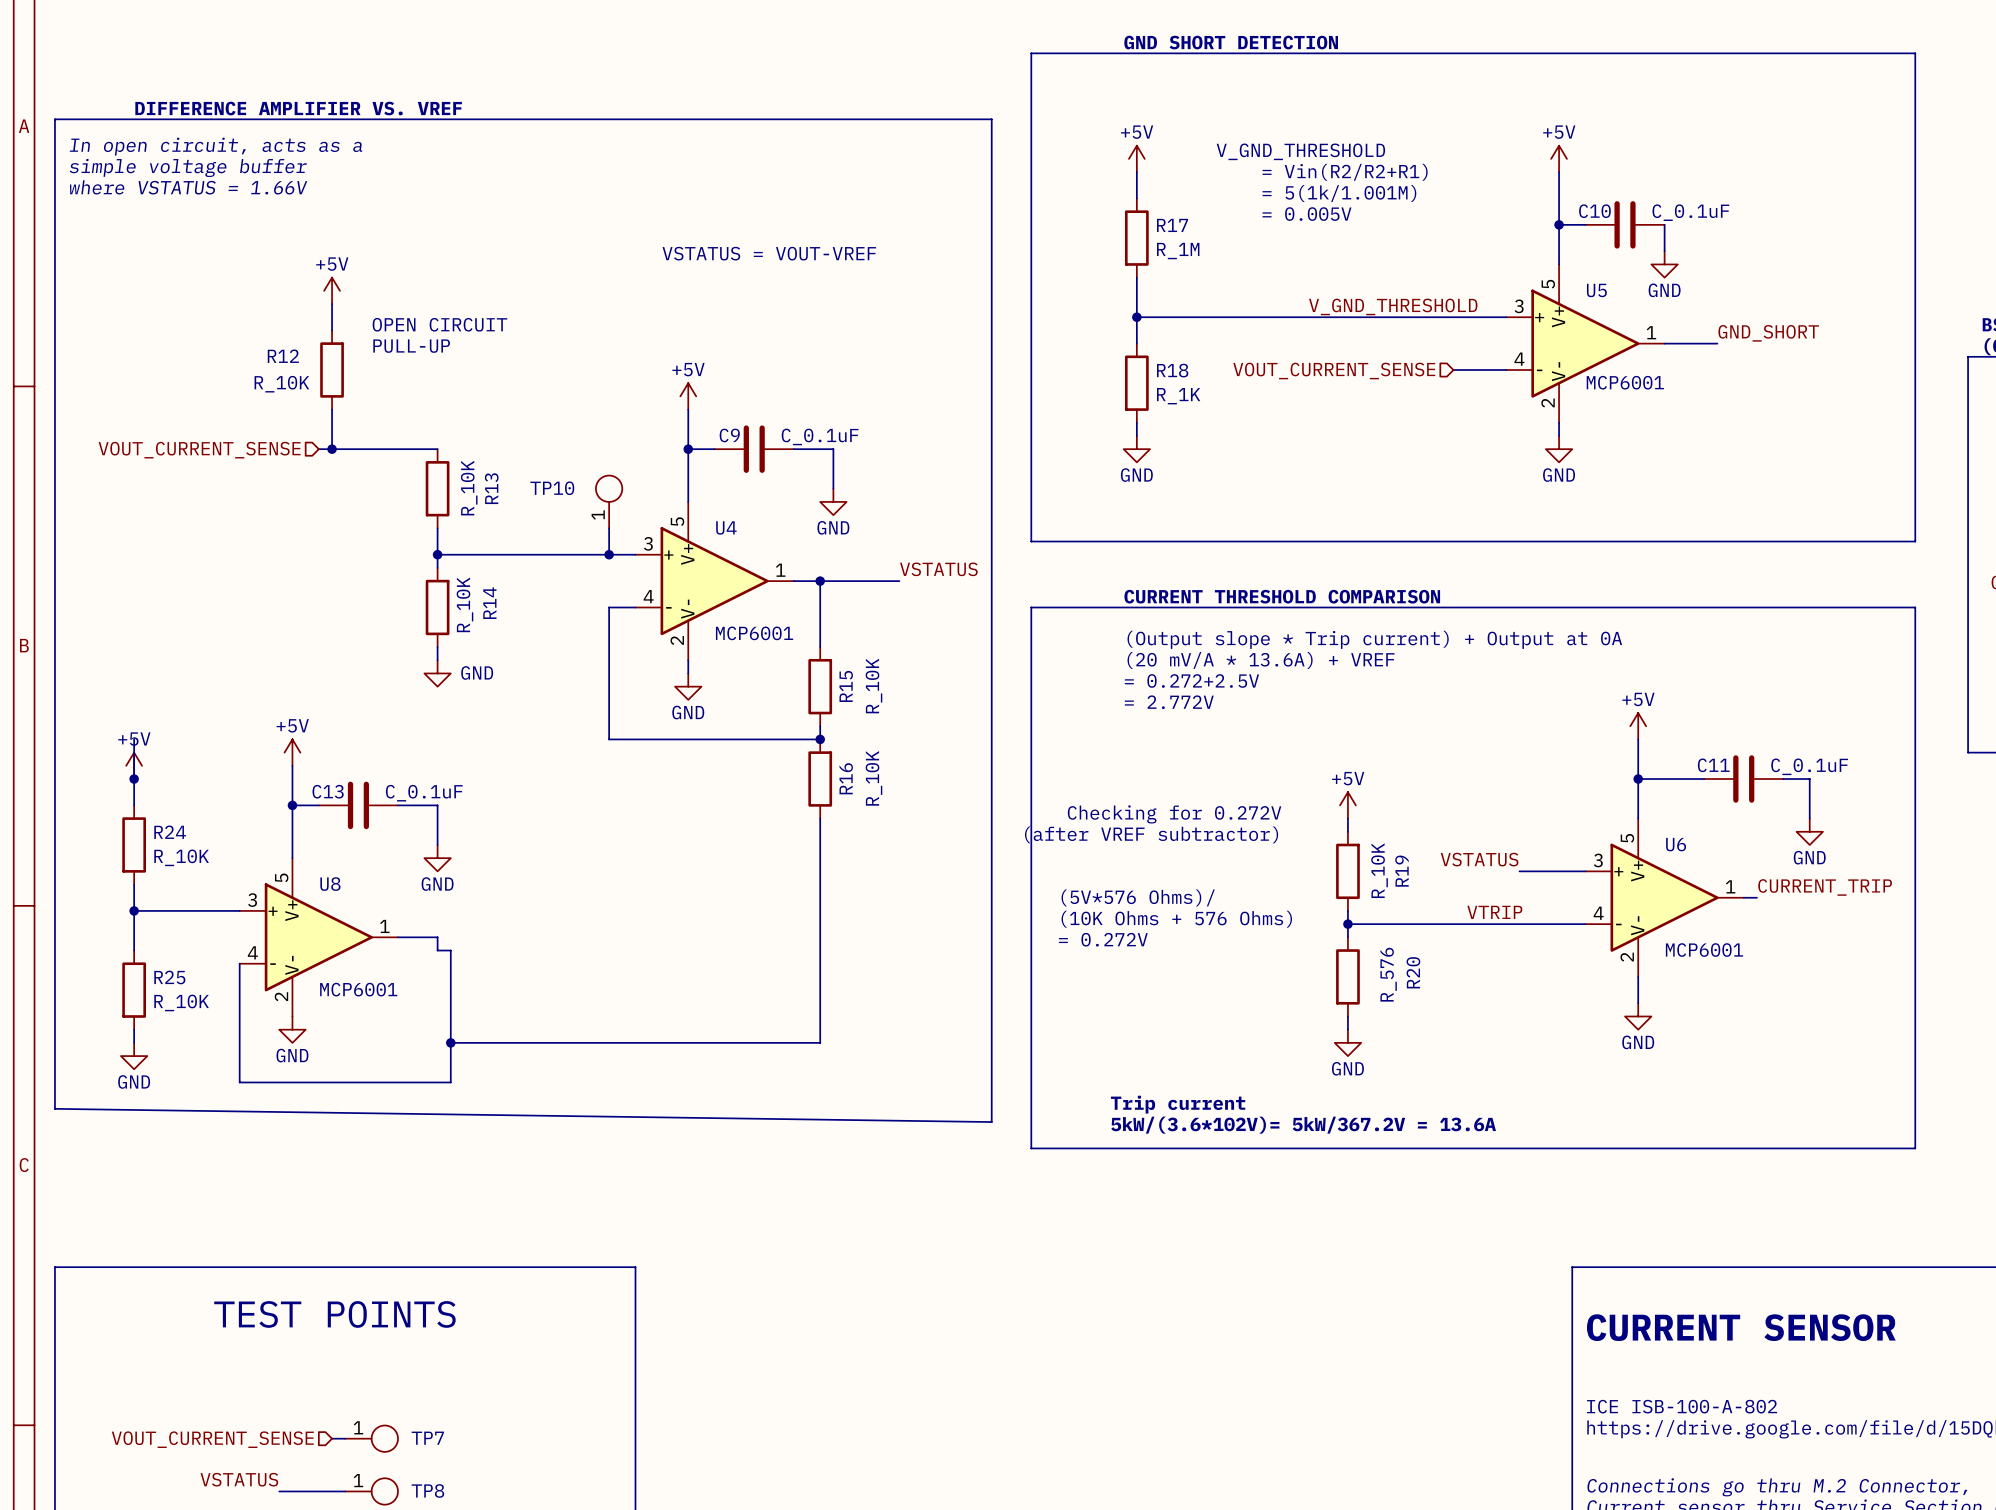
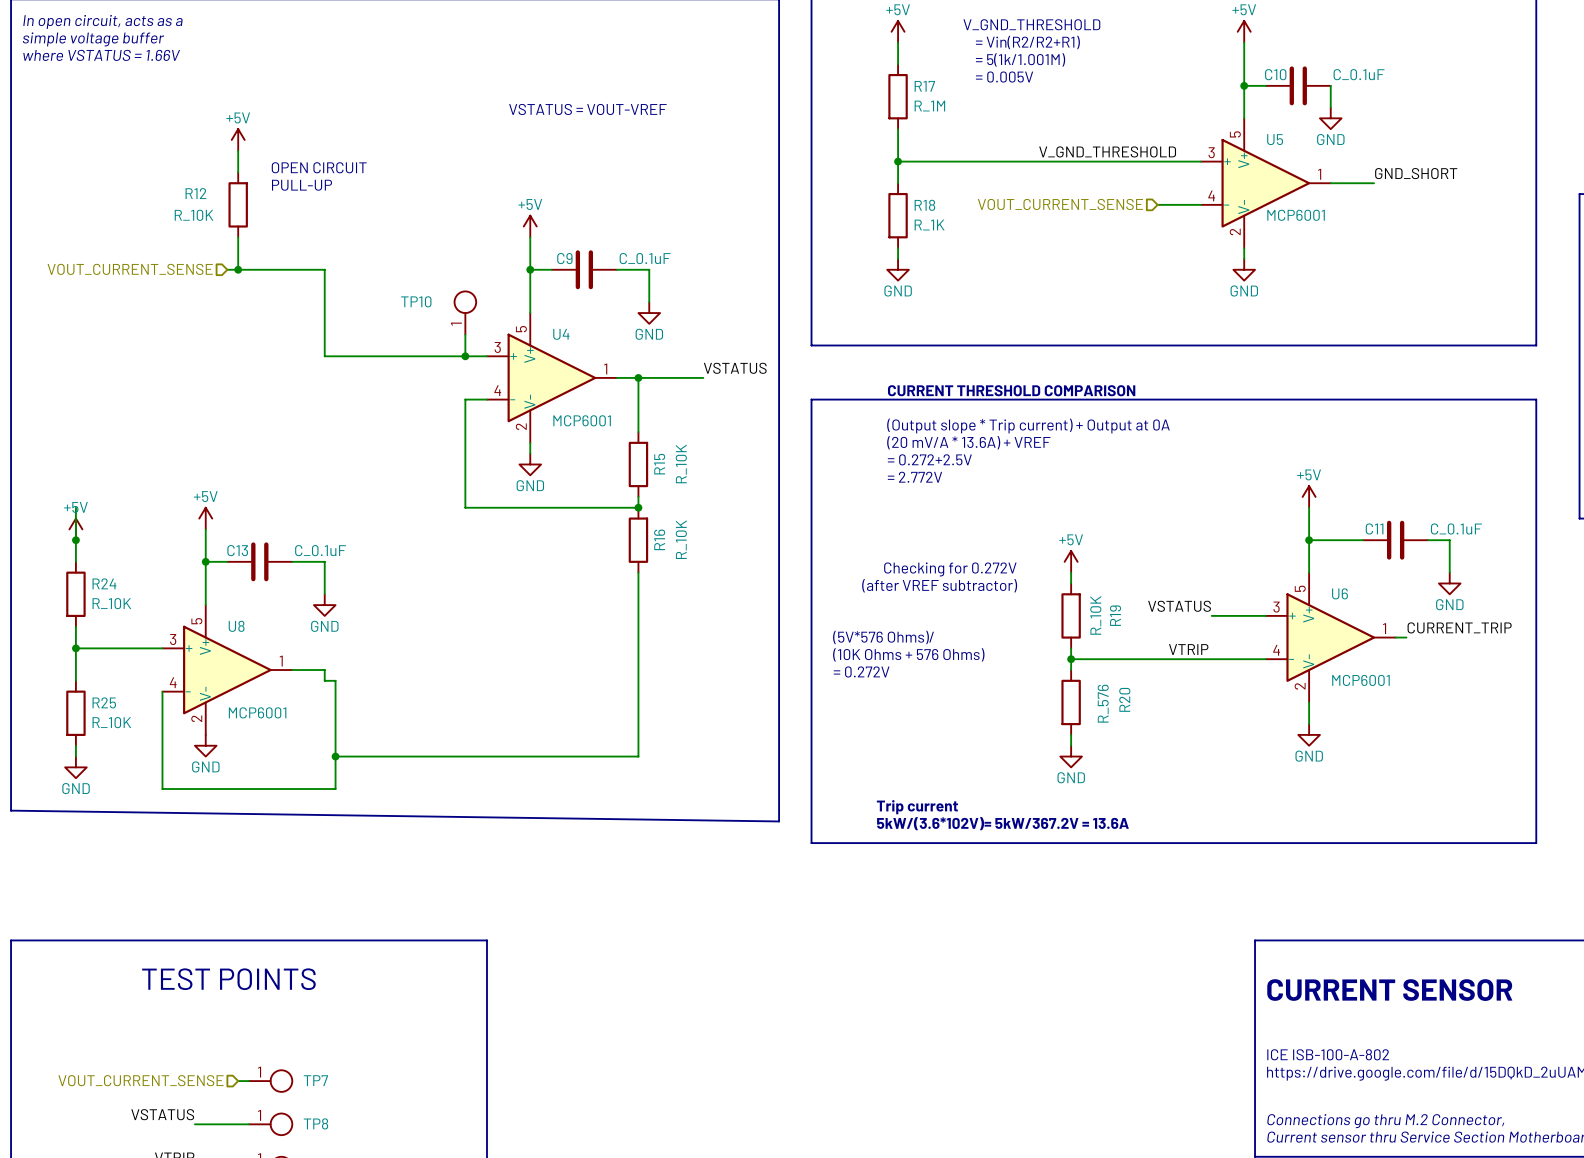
wire: none -> (324, 269) (324, 334)
R13: R_10K (437, 488) -> none
wire: (437, 554) (437, 567) -> none
junction: (437, 554) -> none
R14: R_10K (437, 607) -> none
wire: (437, 647) (437, 660) -> none
power symbol: GND (437, 673) -> none

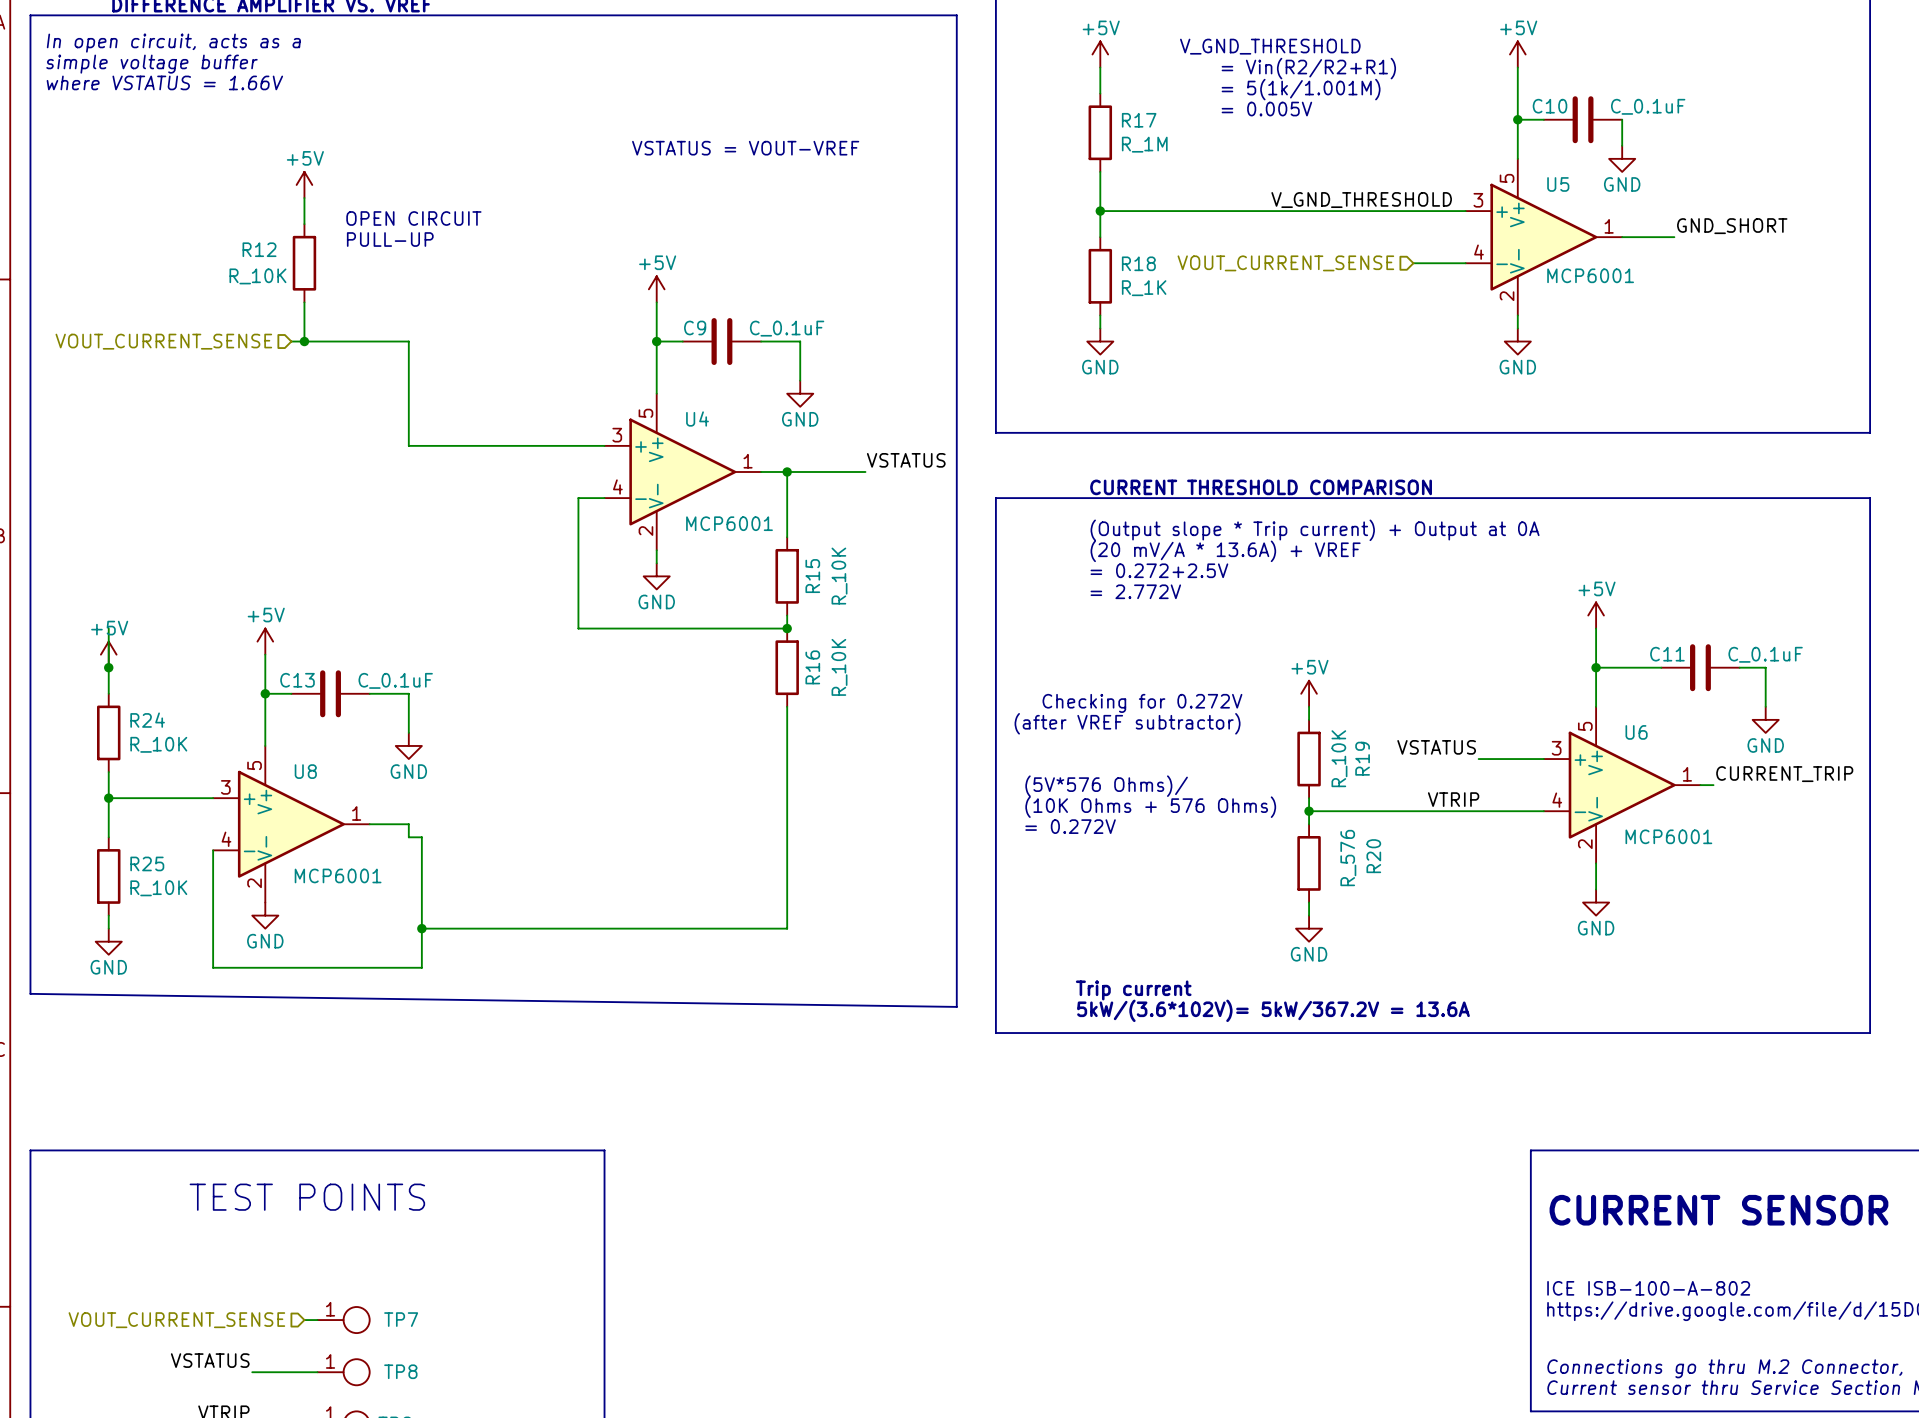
TP10: (465, 313) -> none
wire: (465, 334) (465, 356) -> none
junction: (465, 356) -> none

